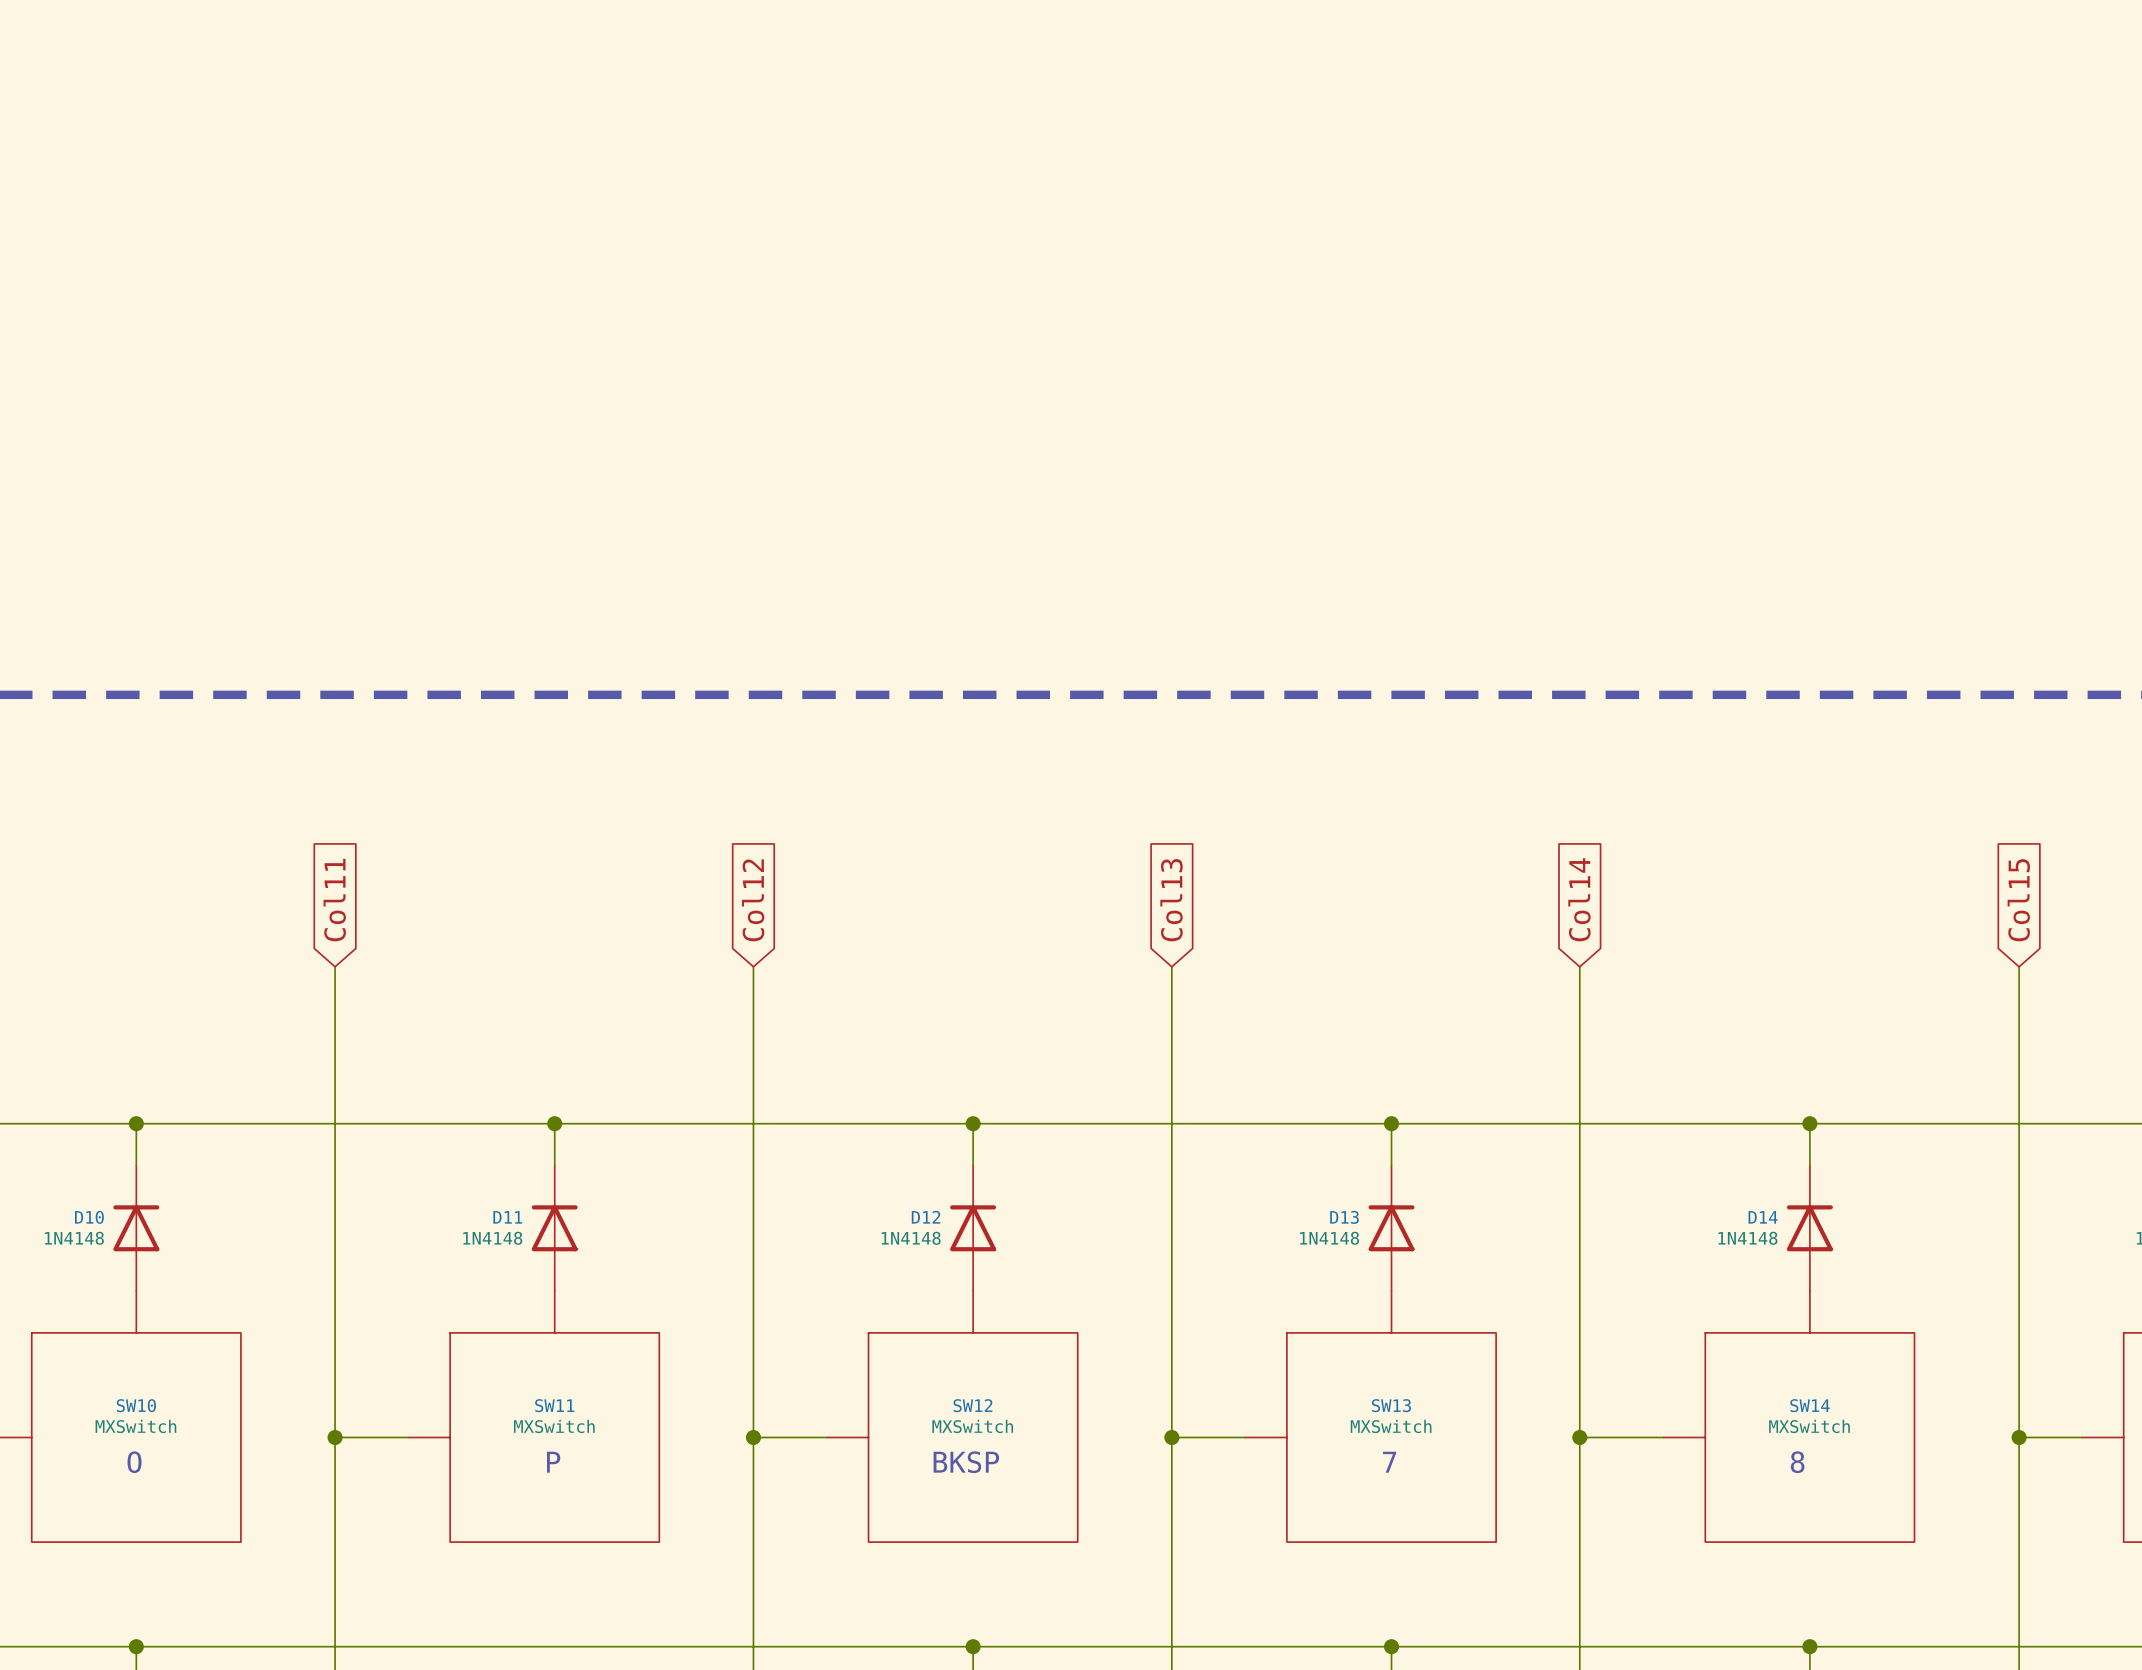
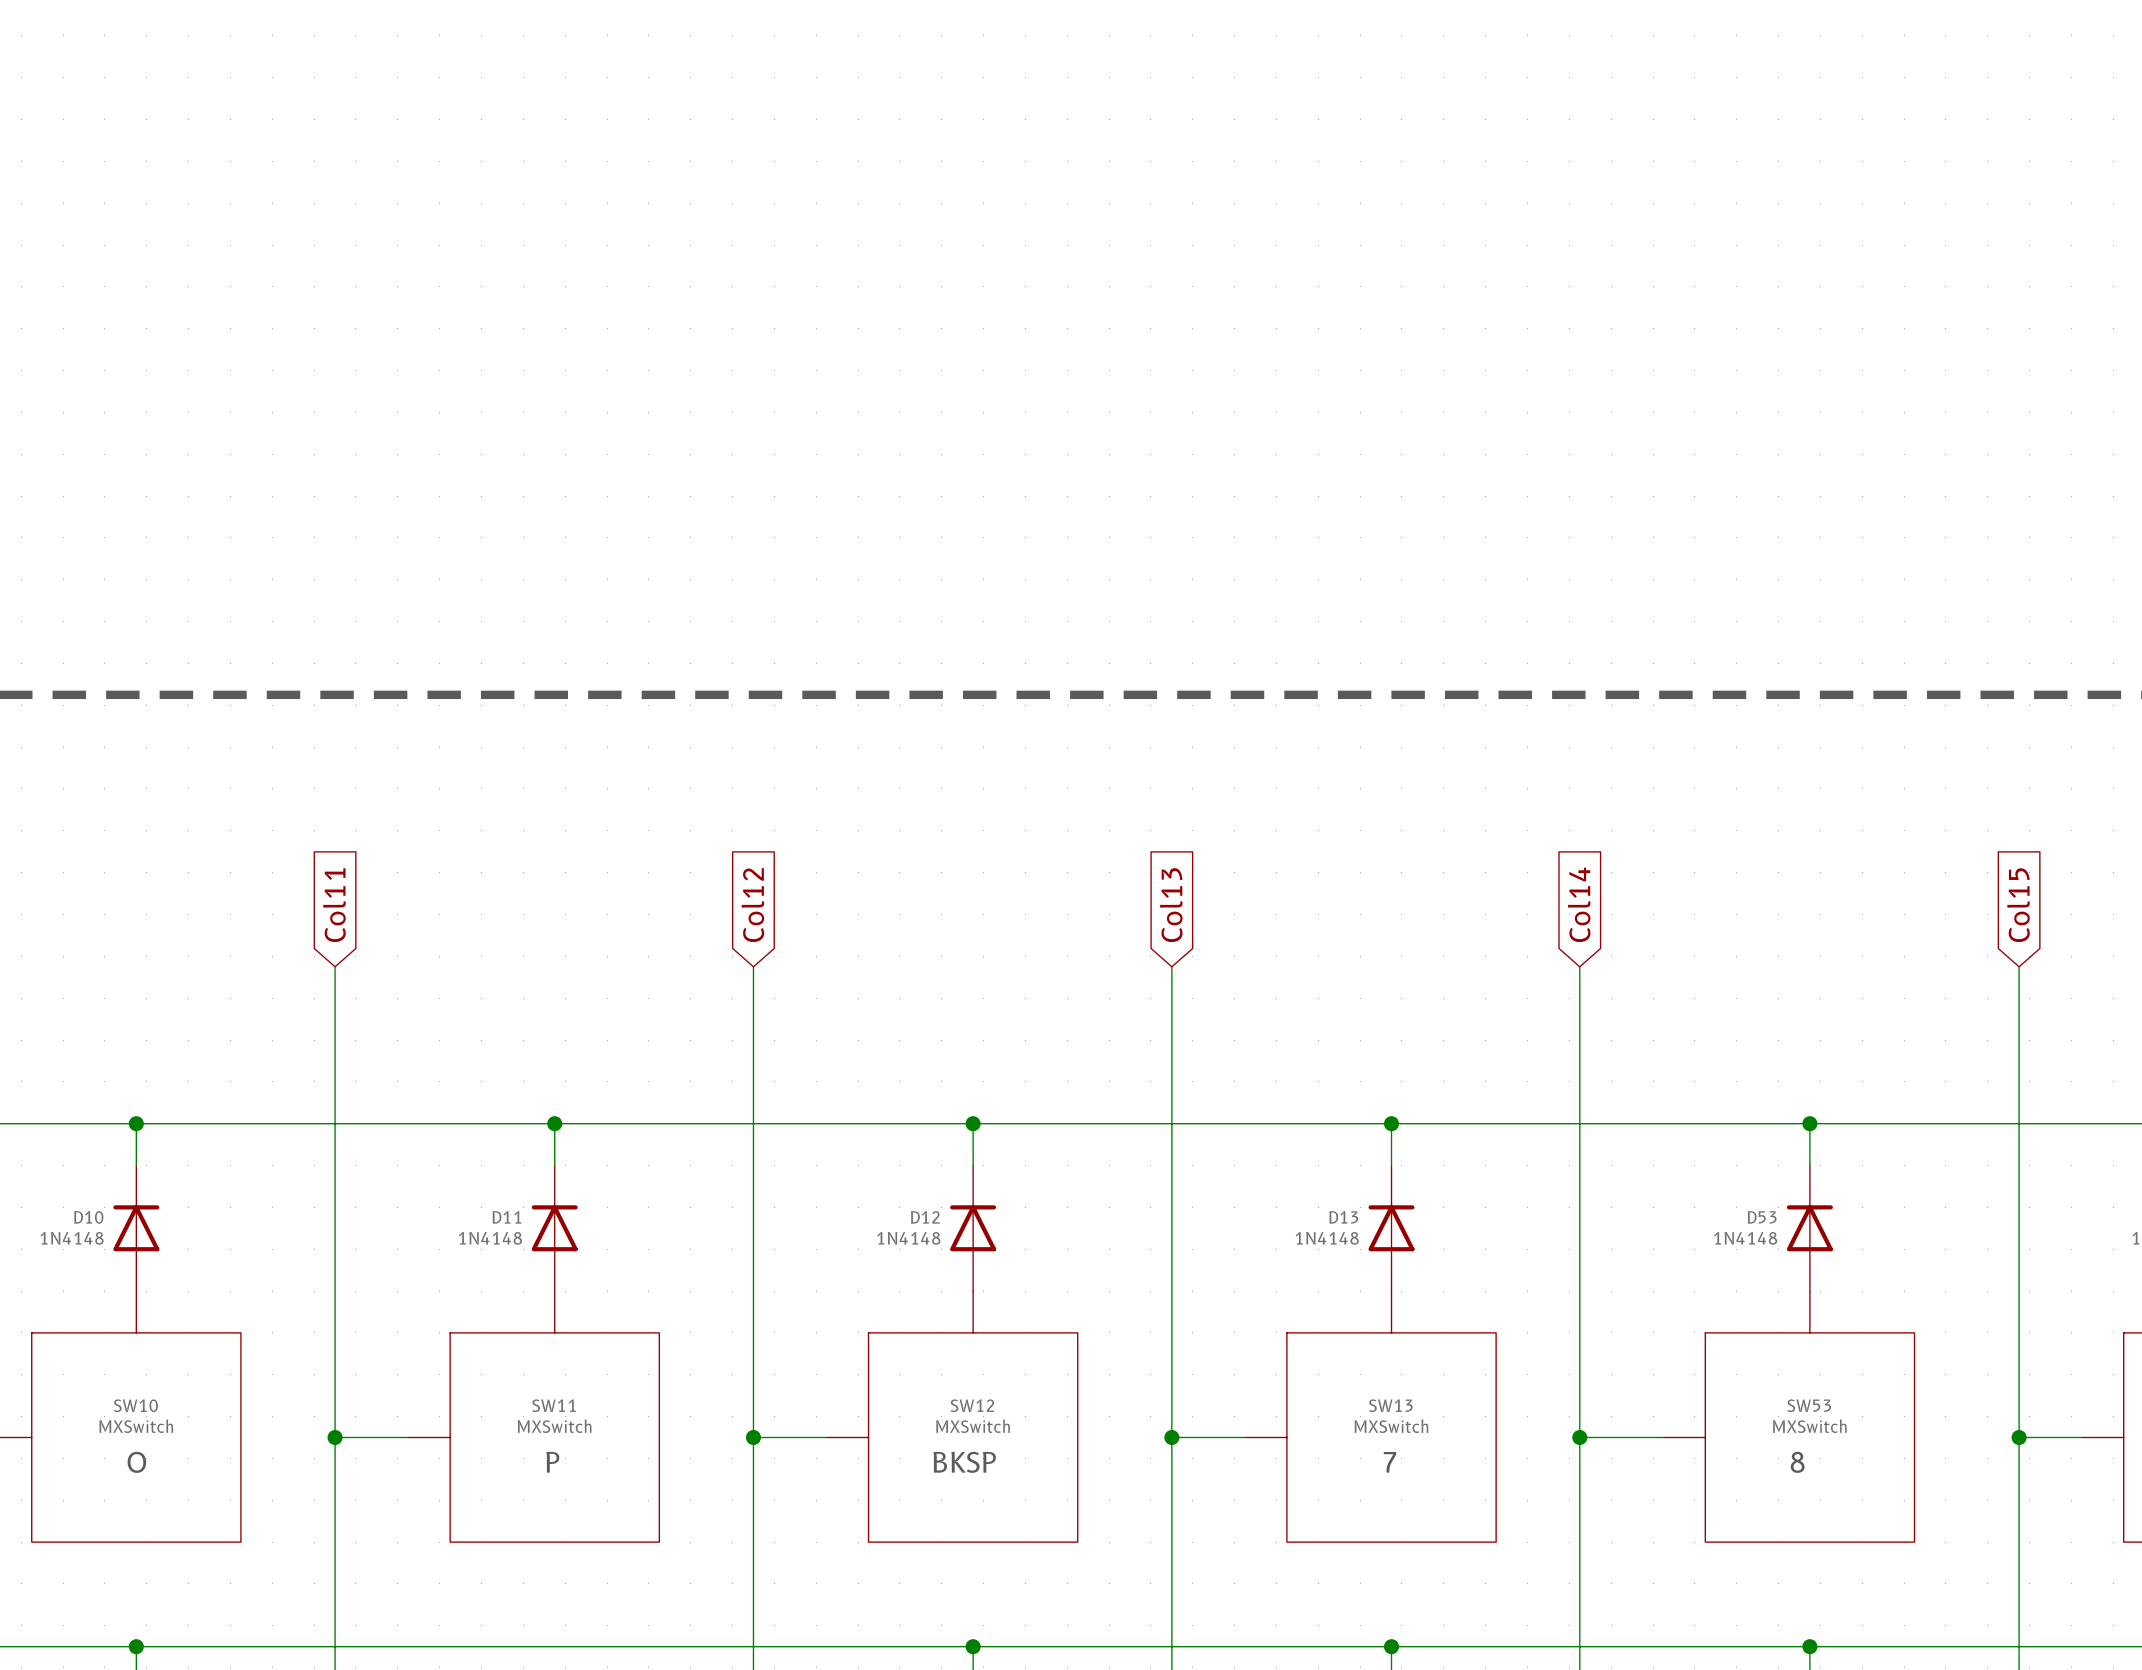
D14 name: D14 (1763, 1217) -> D53 (1762, 1217)
SW14 name: SW14 (1810, 1405) -> SW53 (1809, 1405)

